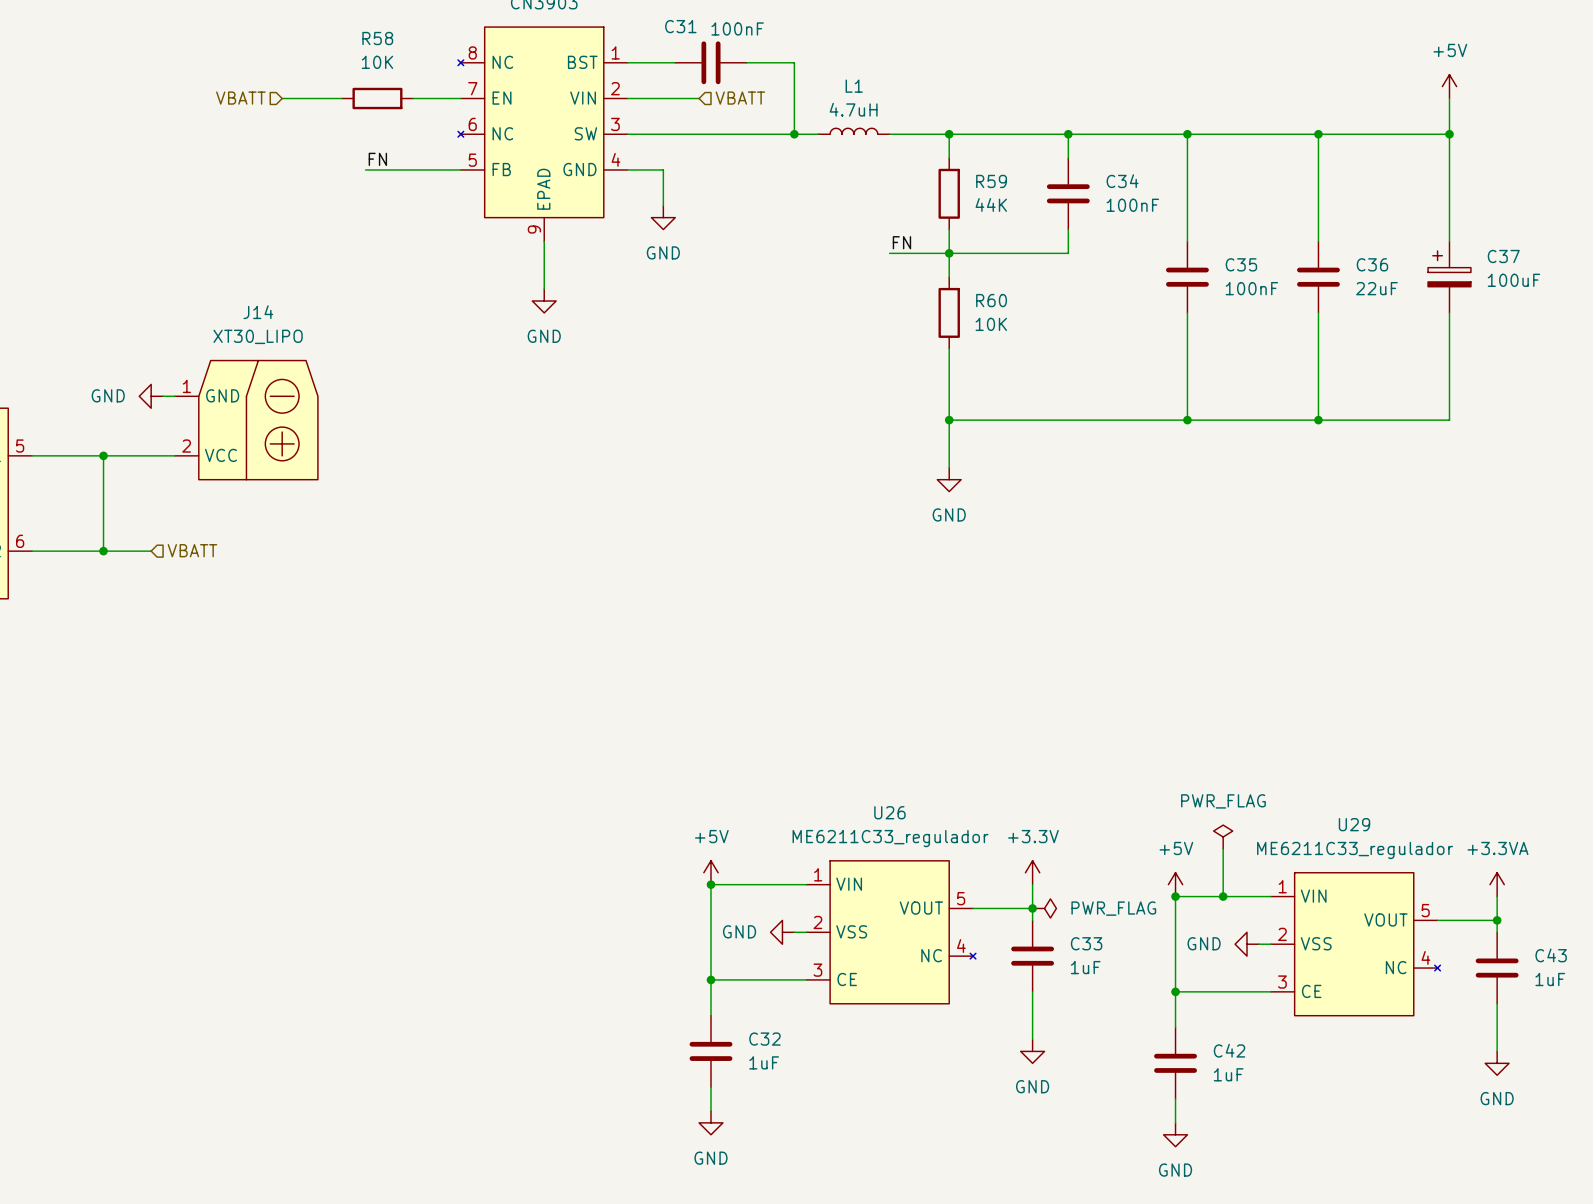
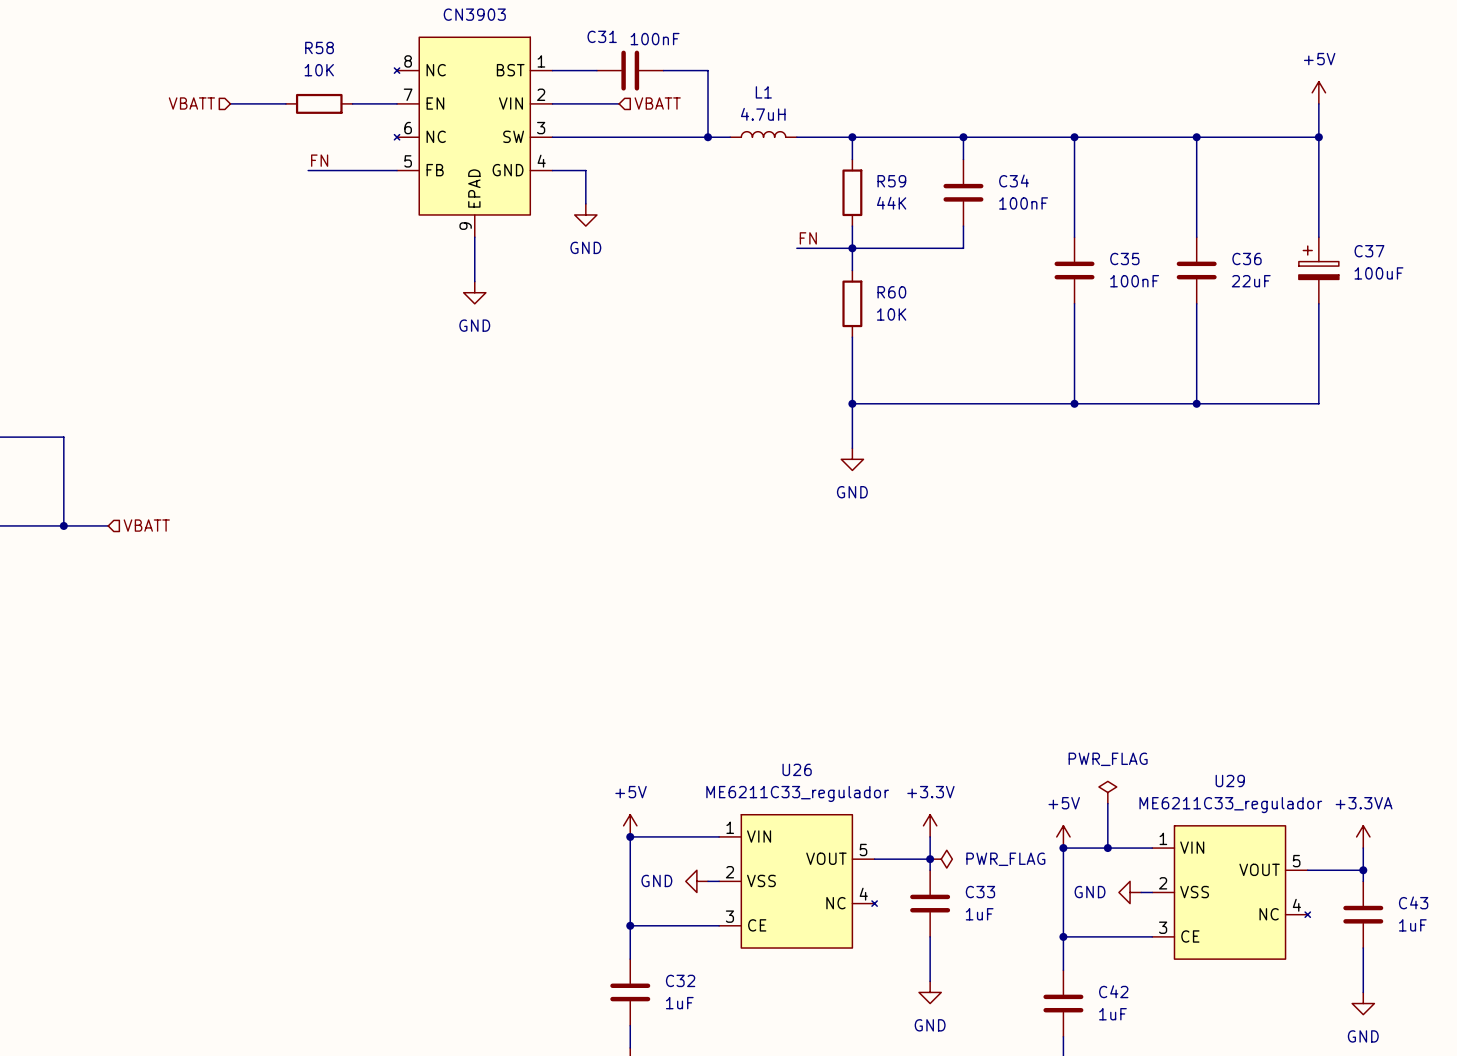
power symbol: GND (151, 396) -> none
wire: (163, 396) (174, 396) -> none
J14: XT30_LIPO (246, 420) -> none
wire: (103, 455) (174, 455) -> none
junction: (103, 455) -> none

